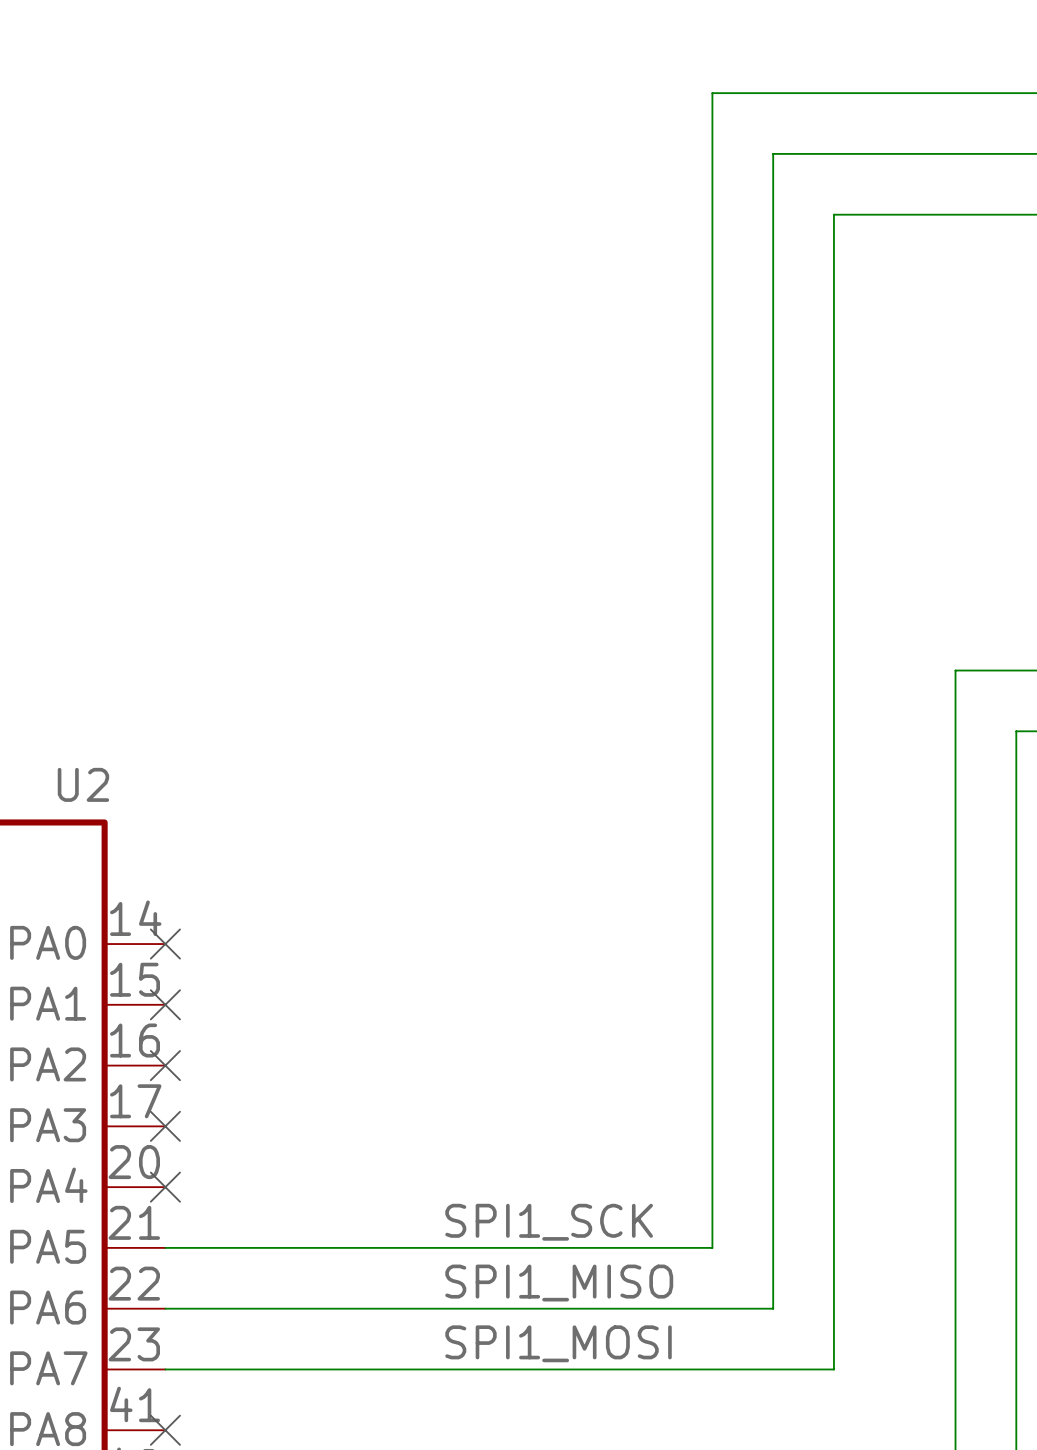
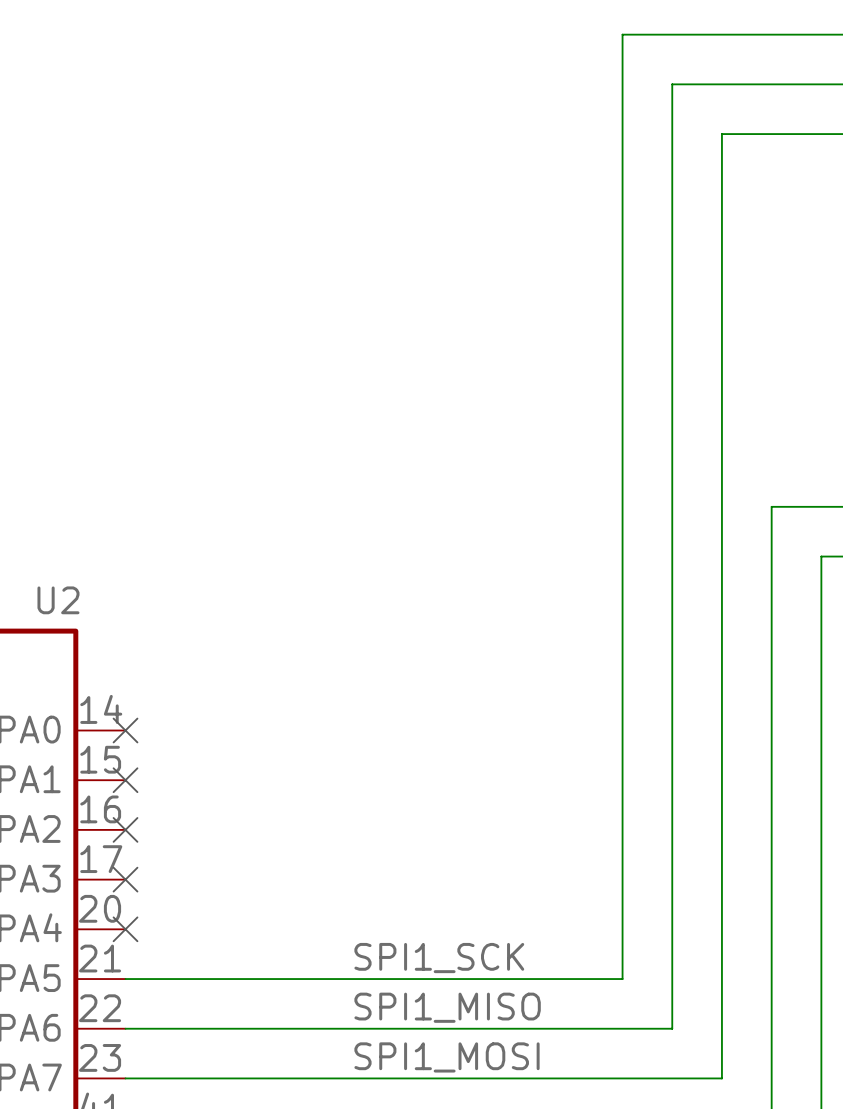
wire: (773, 93) (712, 93) (712, 1247) -> none
wire: (773, 153) (833, 153) -> (622, 84) (622, 34)
wire: (833, 214) (894, 214) -> (672, 134) (672, 84)
wire: none -> (721, 134) (721, 1078) (672, 1078)
wire: (773, 1247) (773, 1308) -> (622, 979) (572, 979)
wire: (833, 1308) (833, 1369) -> (672, 1028) (622, 1028)

